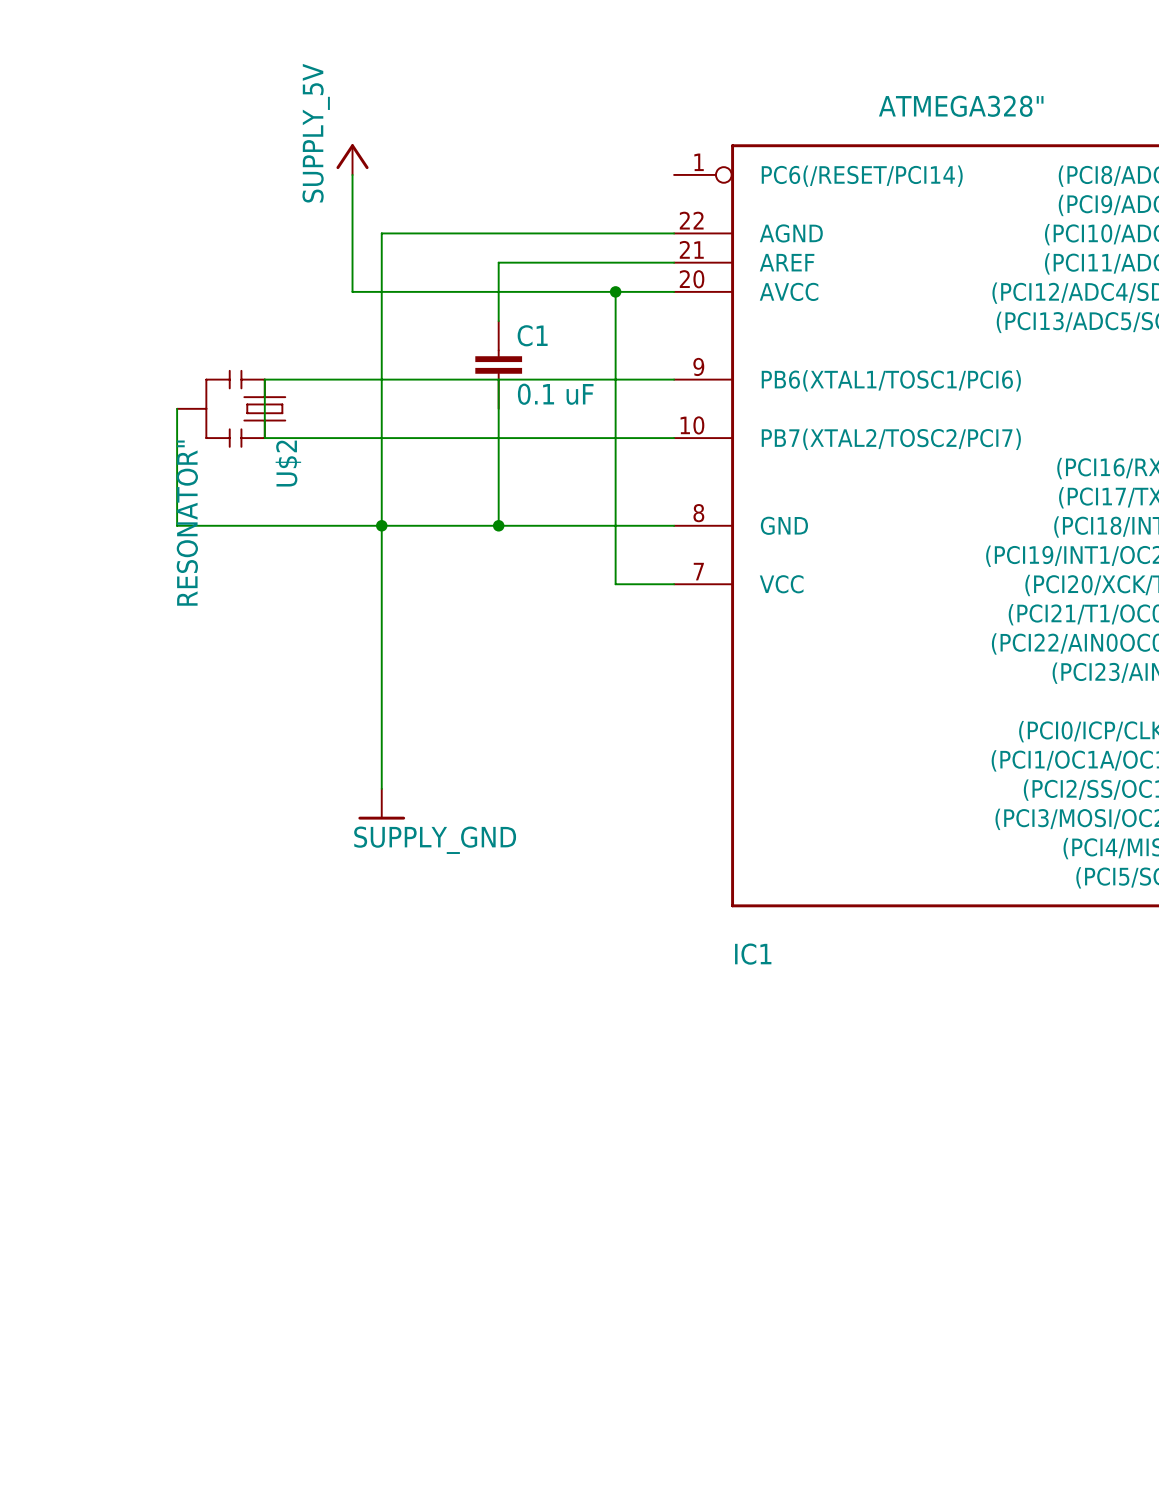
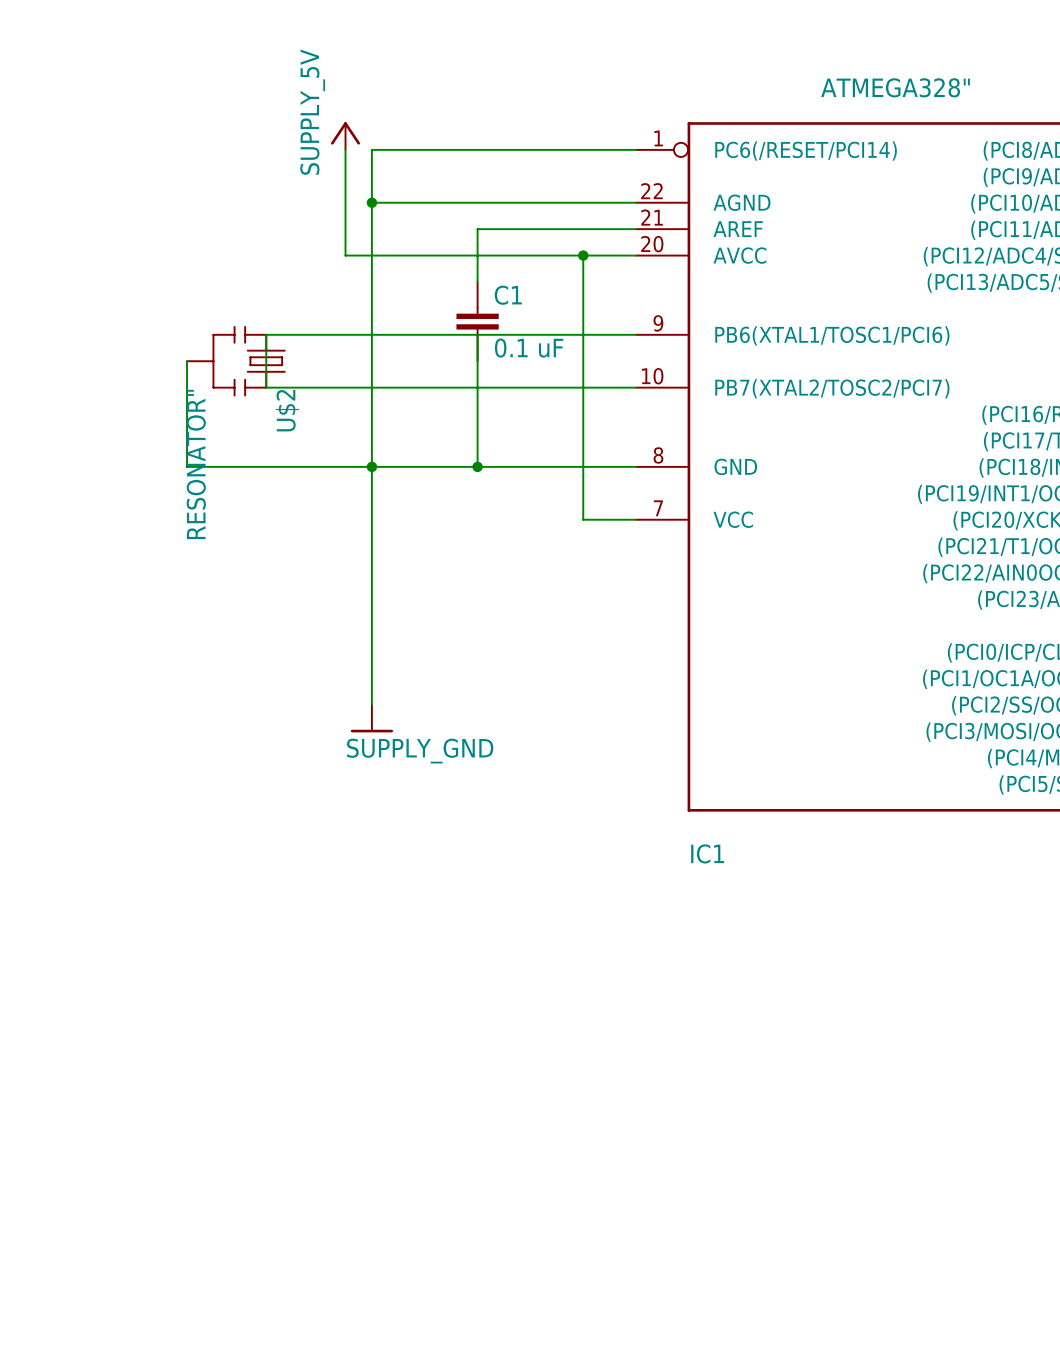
wire: none -> (636, 149) (371, 149) (371, 202)
junction: none -> (371, 202)

